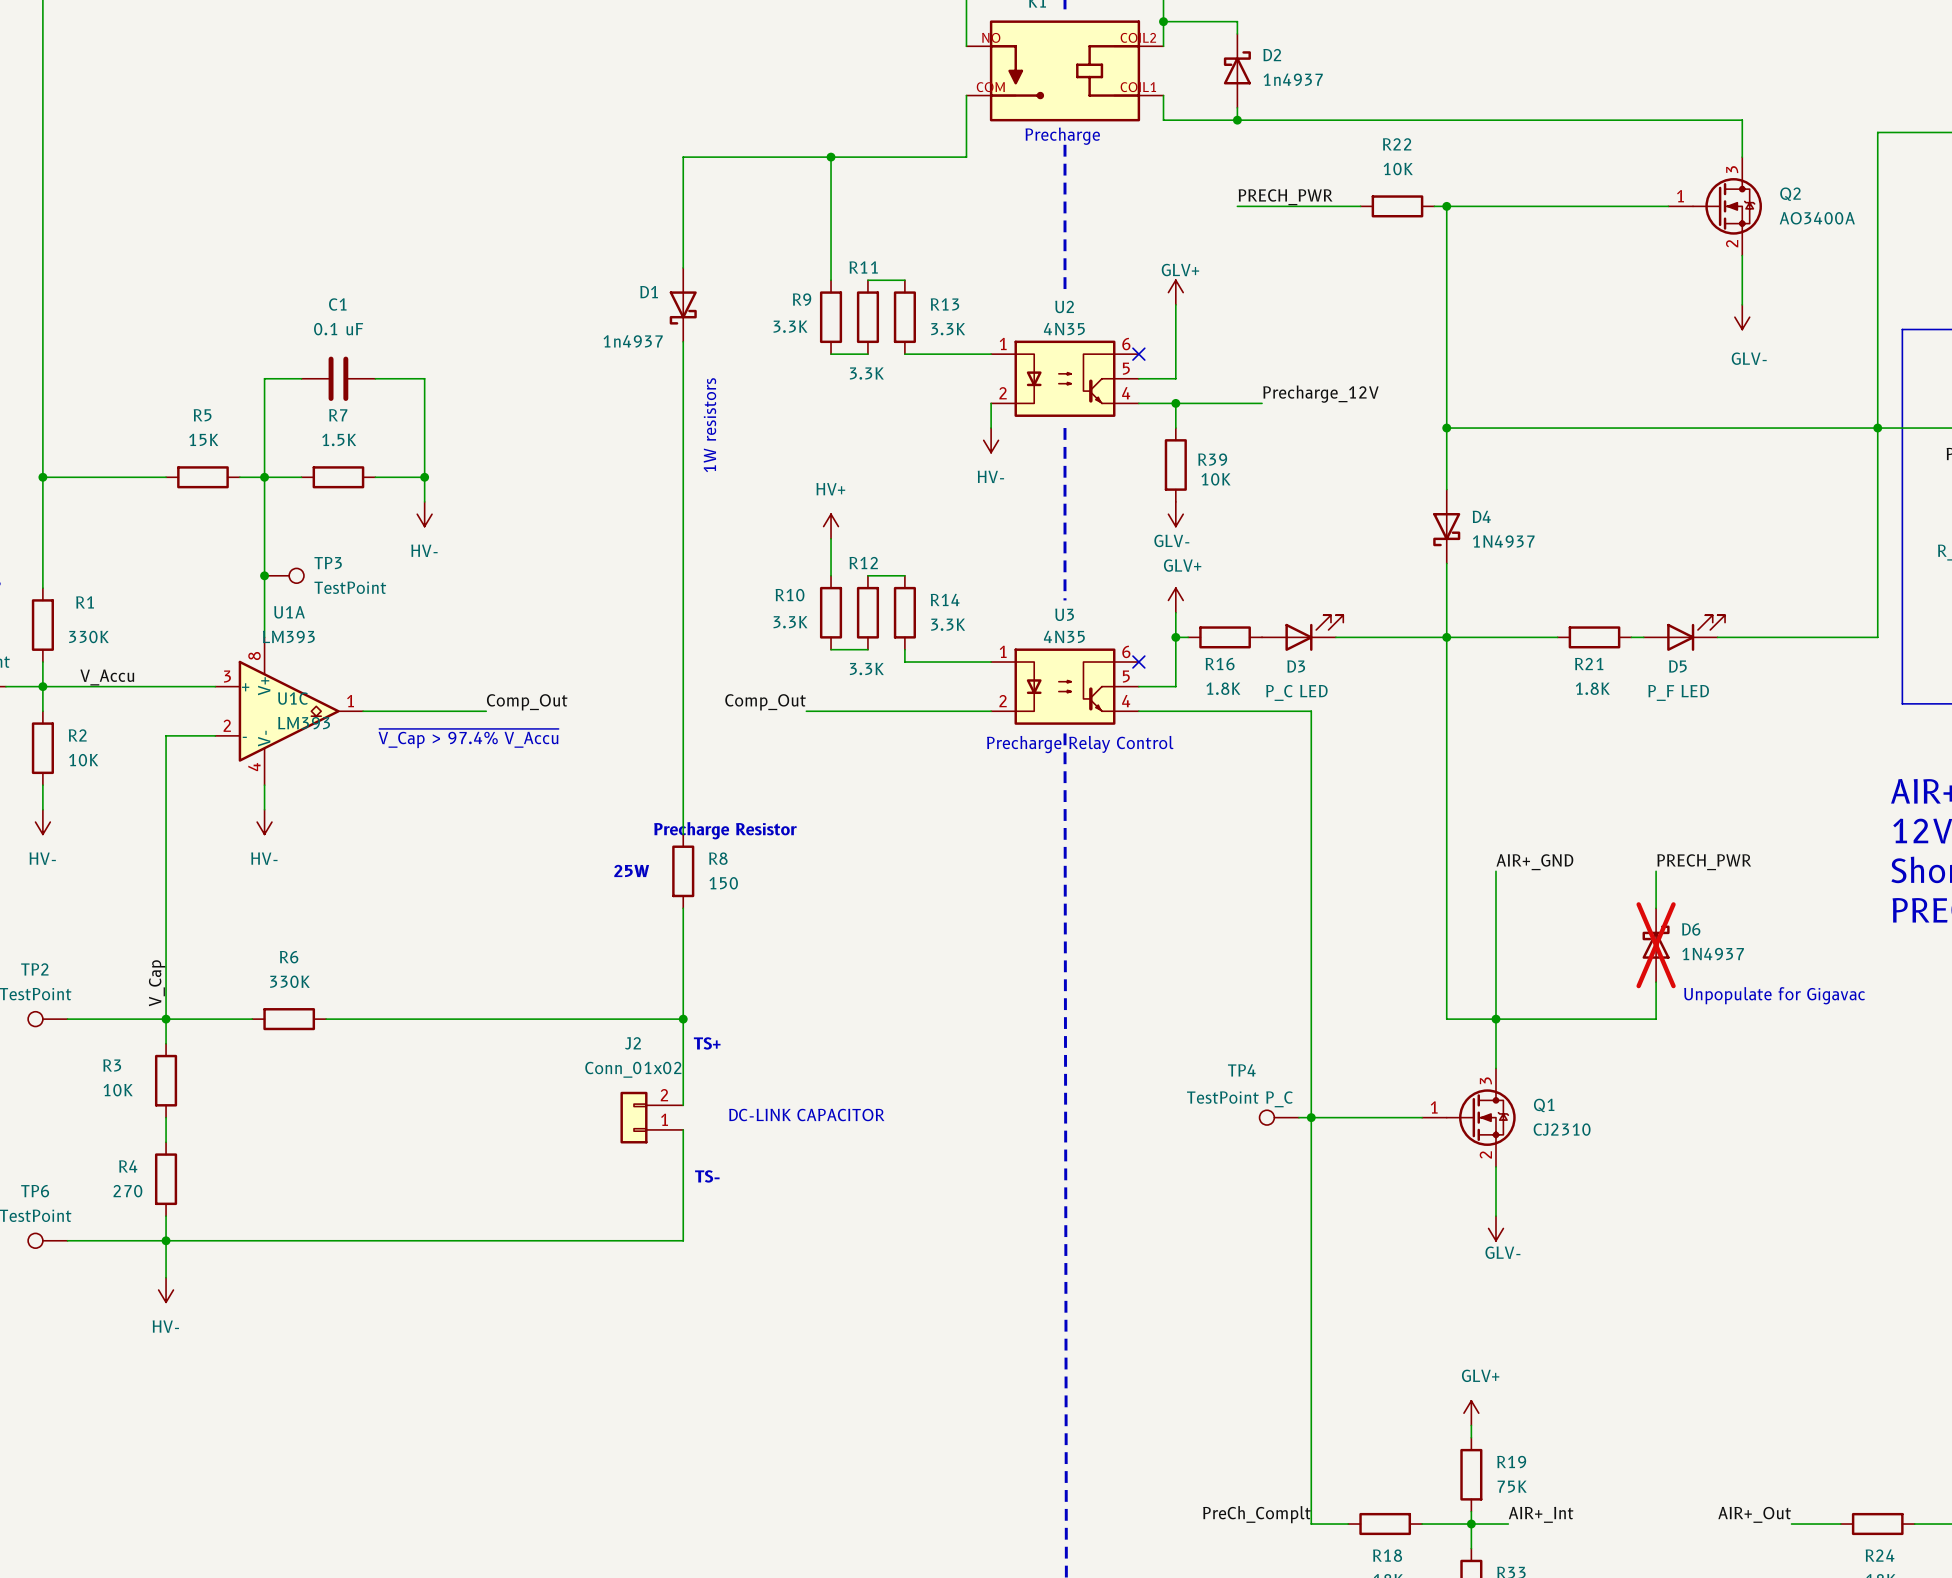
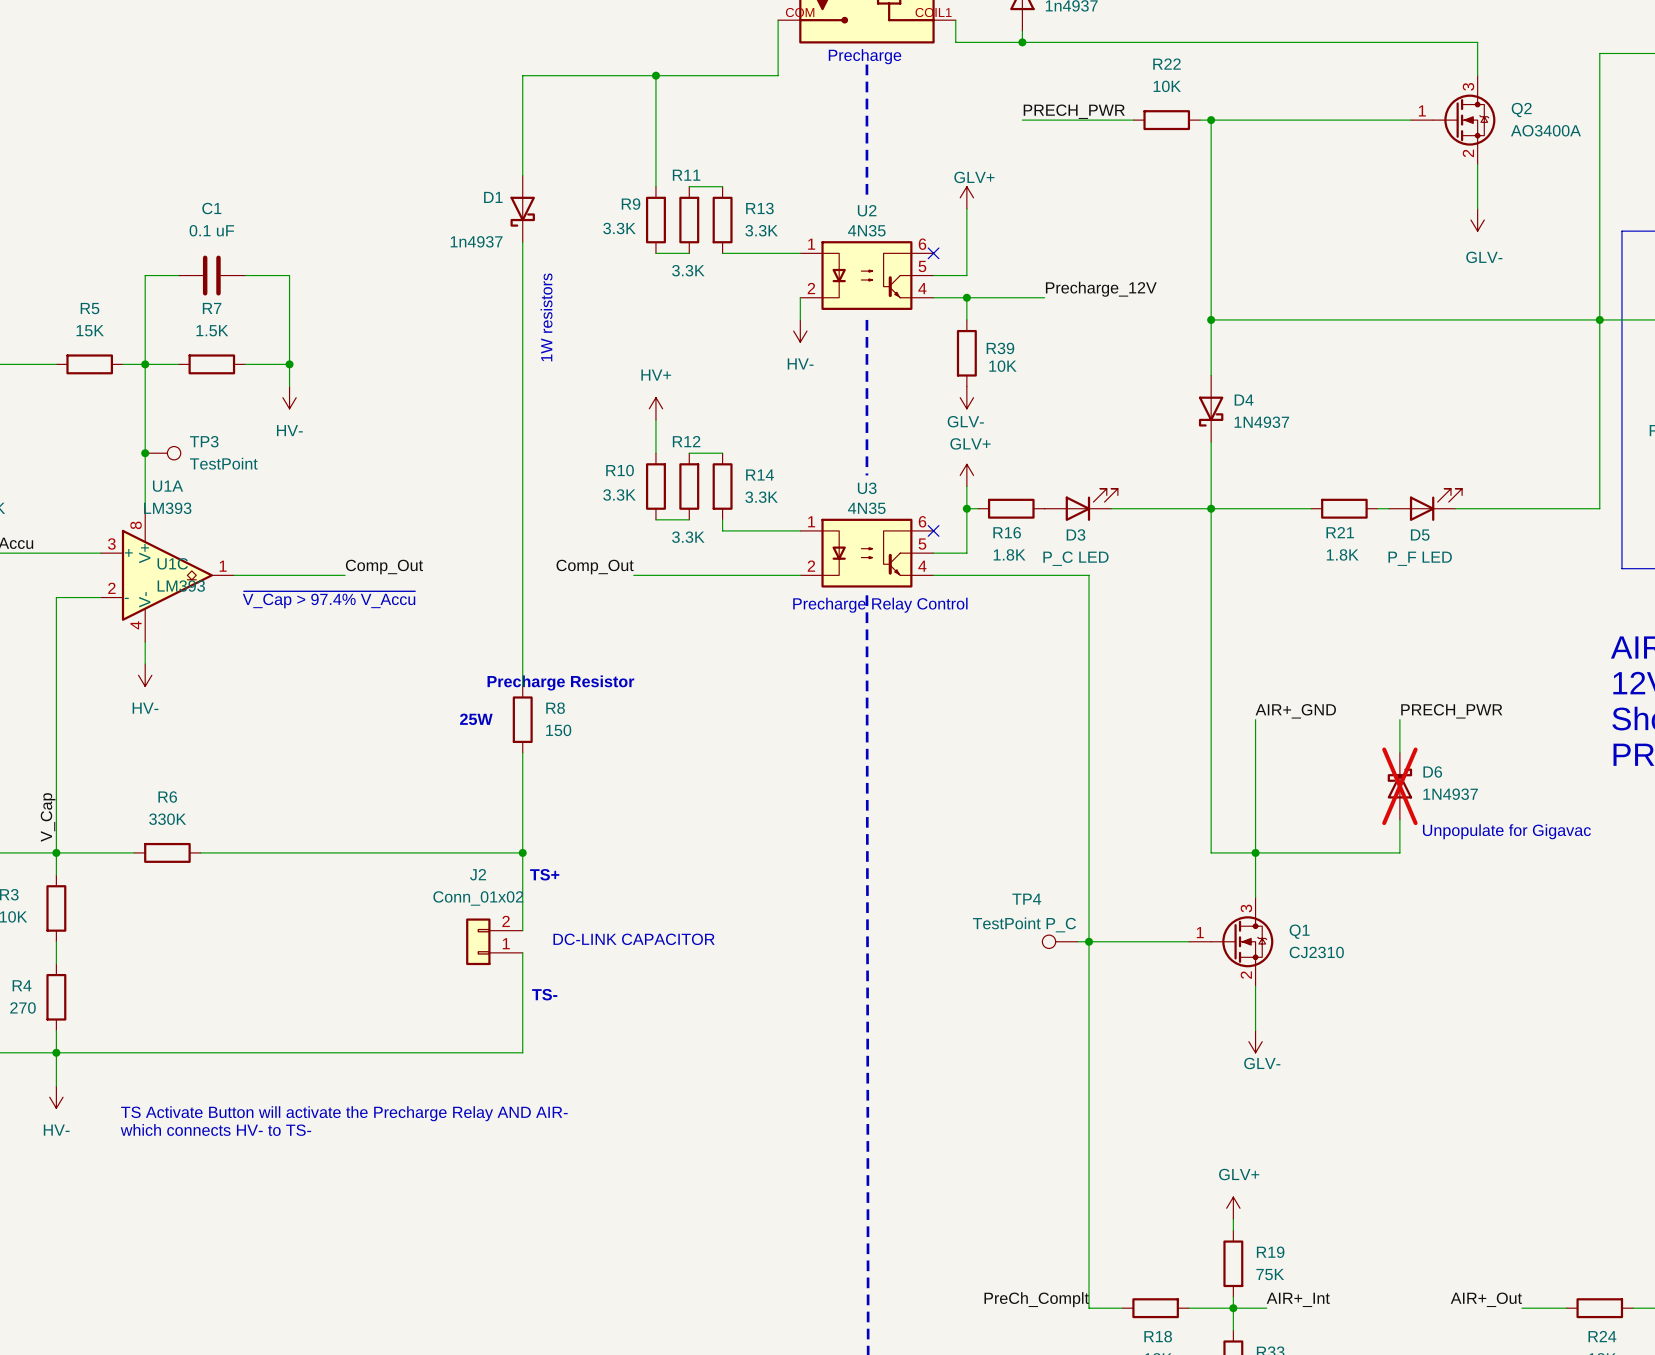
text: none -> TS Activate Button will activate the Precharge Relay AND AIR- (344, 1113)
text: none -> which connects HV- to TS- (215, 1129)

